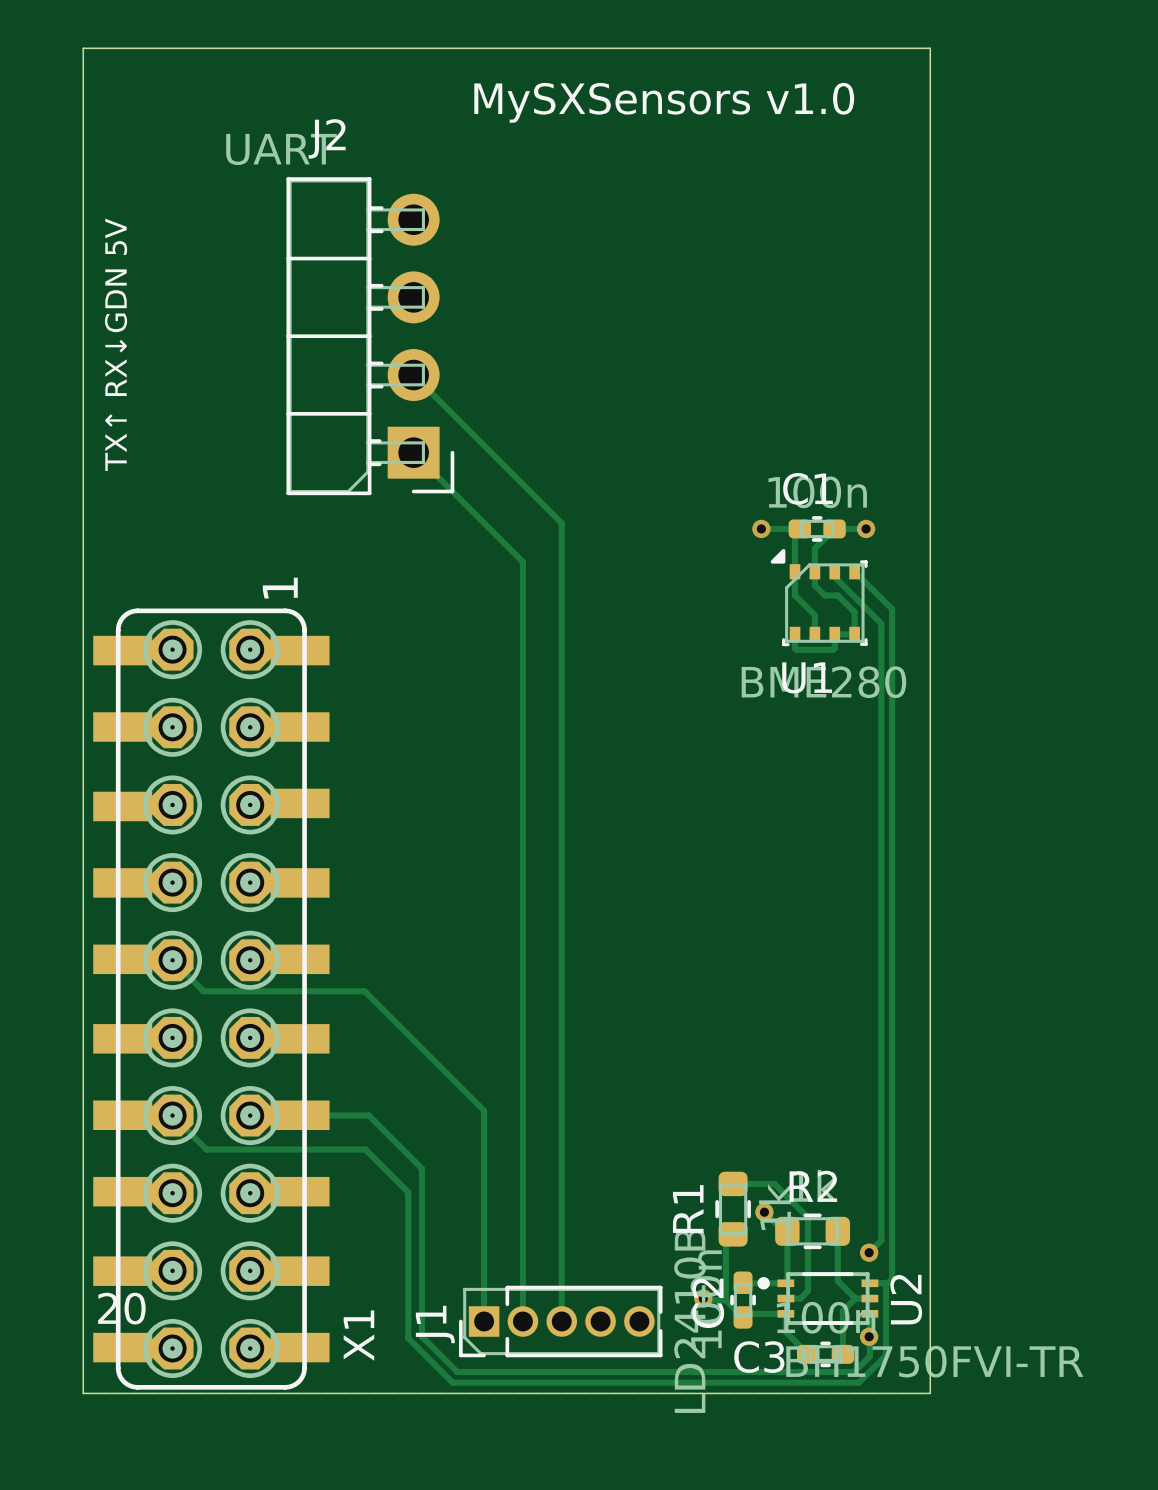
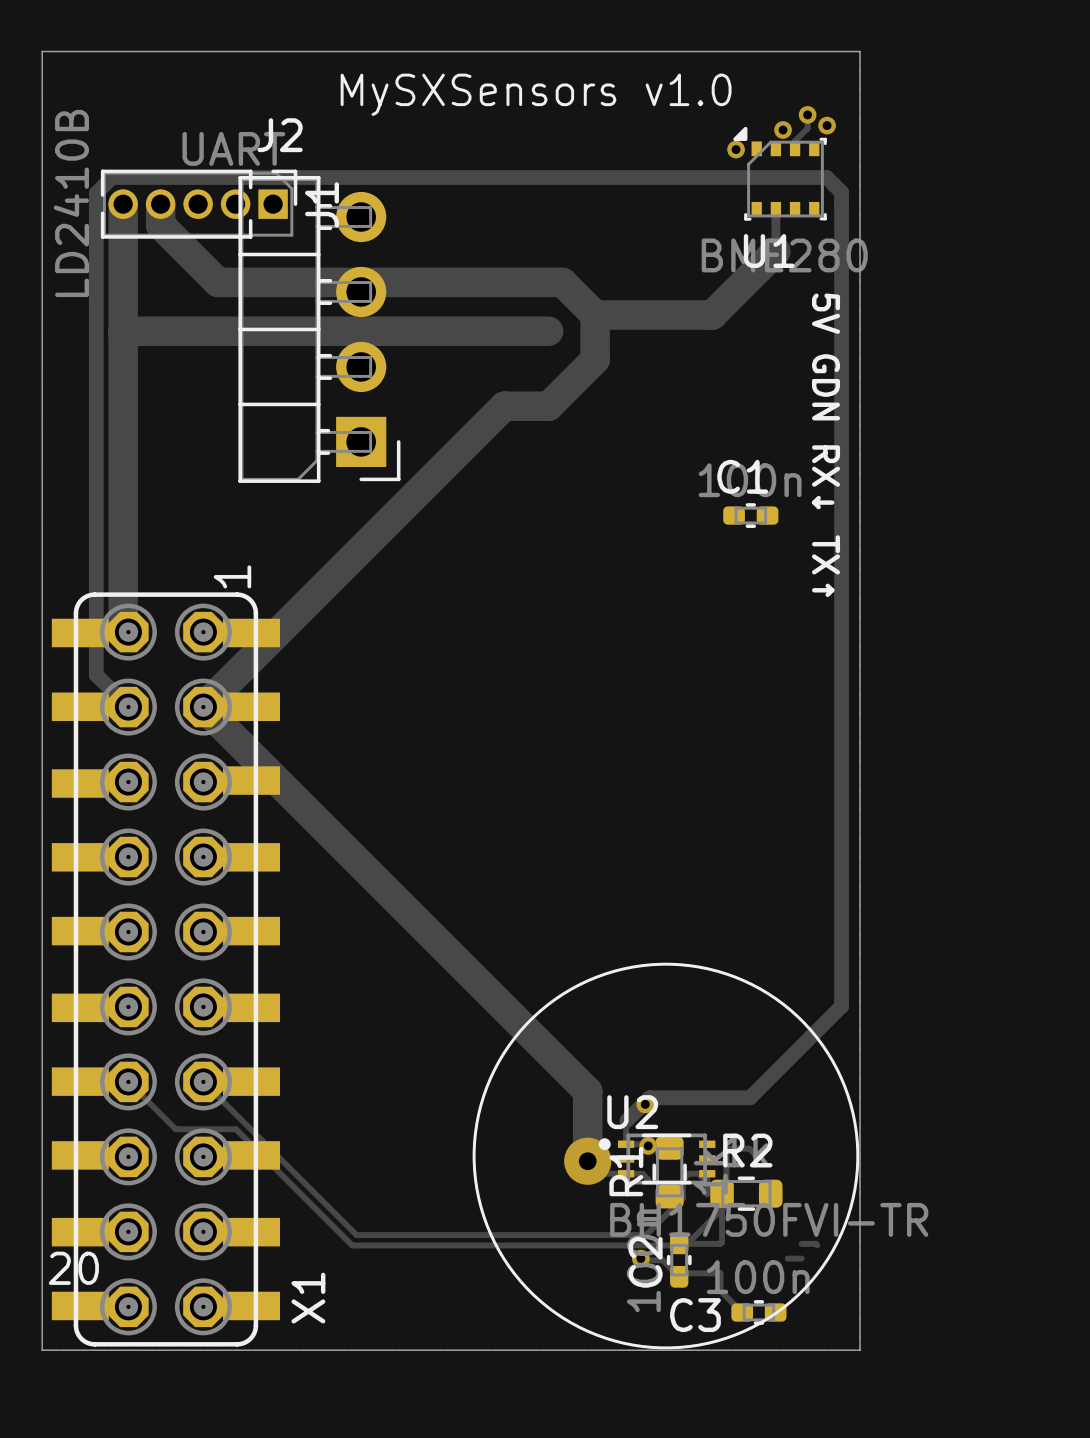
text position: MySXSensors v1.0 (664, 102) -> MySXSensors v1.0 (536, 94)
track: none -> (807, 114) (807, 128) (795, 141) (795, 148)
via: none -> (807, 114)
via: none -> (827, 125)
via: none -> (783, 129)
via: none -> (736, 149)
track: none -> (123, 204) (123, 626) (128, 632)
track: none -> (160, 204) (160, 225) (217, 282) (562, 282) (595, 315)
track: none -> (775, 209) (775, 251) (712, 315) (595, 315)
track: none -> (595, 315) (595, 359) (548, 406) (504, 406) (203, 707) (587, 1091) (587, 1161) (600, 1173) (642, 1173) (648, 1179)
track: none -> (548, 331) (123, 332)
text: TX↑ RX↓GDN 5V (116, 344) -> none
track: (413, 375) (561, 523) (561, 1321) -> none
text: none -> 5V GDN RX↓ TX↑ (826, 445)
track: (413, 452) (522, 561) (522, 1321) -> none
track: (761, 528) (799, 528) (795, 533) (795, 595) (814, 615) (814, 634) -> none
via: (761, 528) -> none
track: (866, 528) (834, 528) (814, 548) (814, 585) (824, 595) (837, 595) (854, 612) (854, 634) (834, 634) (833, 649) (796, 649) (795, 634) -> none
via: (866, 528) -> none
track: (834, 571) (834, 577) (881, 623) (881, 1240) (869, 1252) -> none
track: (854, 571) (892, 609) (892, 1278) (886, 1284) (886, 1355) (858, 1382) (452, 1382) (408, 1338) (408, 1192) (365, 1149) (206, 1149) -> (758, 1157) (749, 1148) (726, 1148) (726, 1204) (685, 1245) (352, 1245) (235, 1129) (175, 1129) (161, 1114)
U1 position: (819, 597) -> (780, 173)
track: none -> (128, 707) (96, 674) (96, 193) (112, 177) (826, 177) (841, 192) (841, 1006) (750, 1097) (649, 1097) (626, 1121) (626, 1144) (646, 1144) (648, 1145)
track: (172, 960) (203, 991) (364, 991) (484, 1110) (484, 1321) -> none
drawing: none -> [472, 962, 860, 1350]
track: (250, 1115) (368, 1115) (422, 1168) (422, 1336) (457, 1371) (854, 1371) (869, 1356) (869, 1313) -> (203, 1081) (356, 1235) (645, 1235) (682, 1198) (682, 1179) (688, 1173) (707, 1173) (707, 1194)
via: none -> (645, 1104)
via: none -> (648, 1145)
track: (733, 1183) (774, 1183) (808, 1217) (808, 1290) (800, 1298) (785, 1298) -> none
via: none -> (587, 1161)
via: (764, 1212) -> none
track: (837, 1231) (837, 1280) (855, 1298) (842, 1311) (842, 1354) -> none
track: (733, 1234) (725, 1241) (725, 1300) -> none
via: (869, 1252) -> none
U2 position: (817, 1298) -> (657, 1159)
U2 name rotation: 0° (906, 1299) -> 90° clockwise (632, 1112)
U2 name position: U2 (906, 1299) -> U2 (632, 1112)
J1 rotation: 0° (560, 1321) -> 180° (199, 204)
J1 position: (560, 1321) -> (199, 204)
via: (869, 1336) -> none

